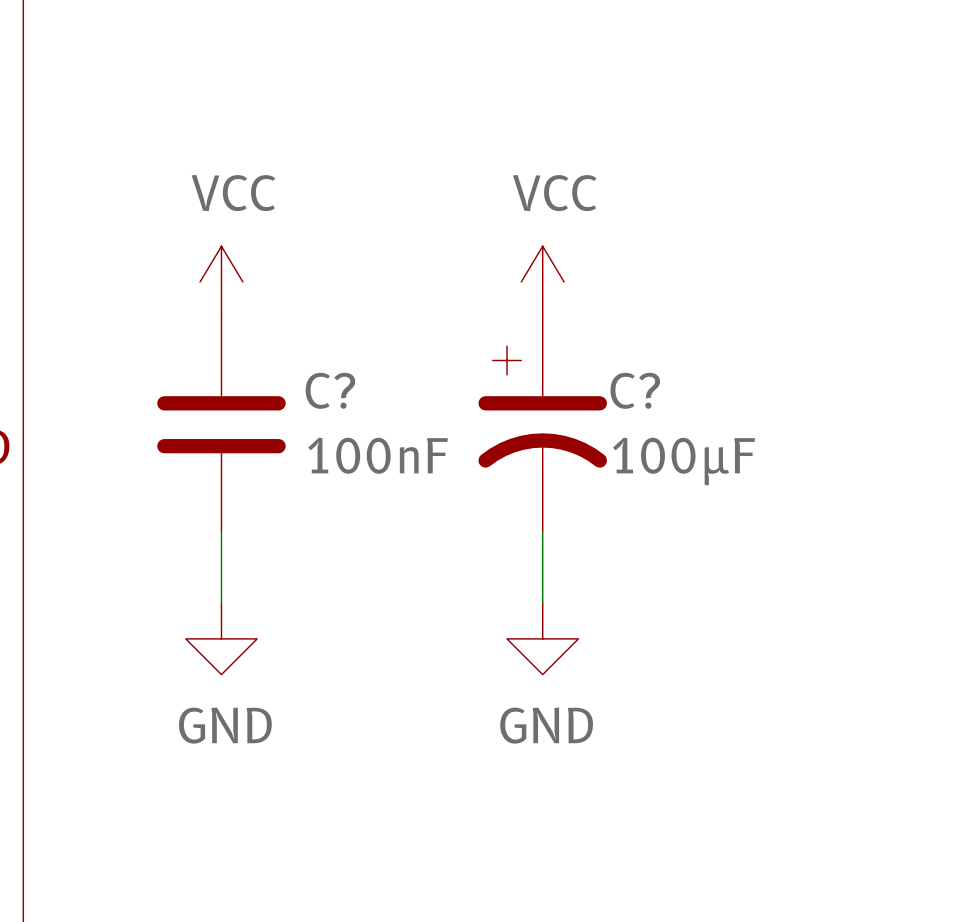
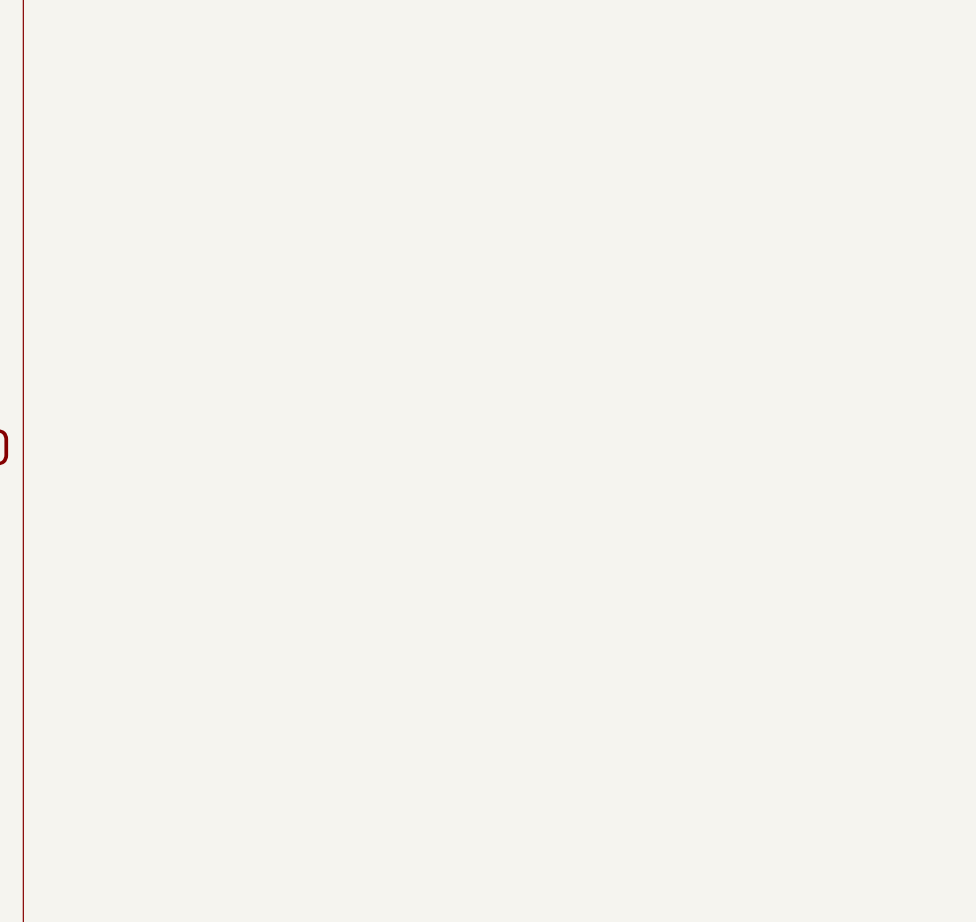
power symbol: VCC (221, 281) -> none
power symbol: VCC (542, 281) -> none
C?: 100nF (221, 424) -> none
C?: 100µF (542, 424) -> none
wire: (221, 531) (221, 603) -> none
wire: (542, 531) (542, 603) -> none
power symbol: GND (221, 638) -> none
power symbol: GND (542, 638) -> none

